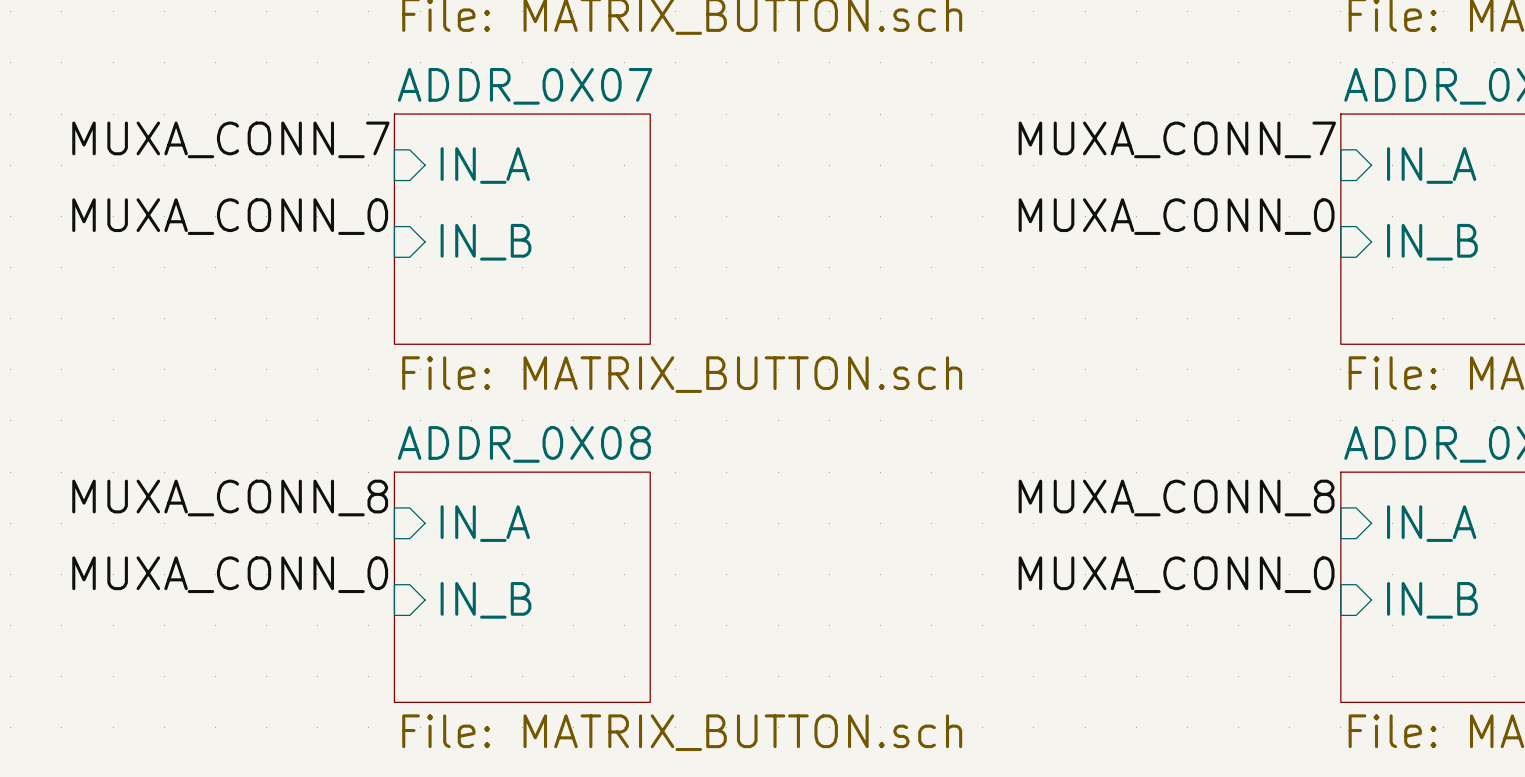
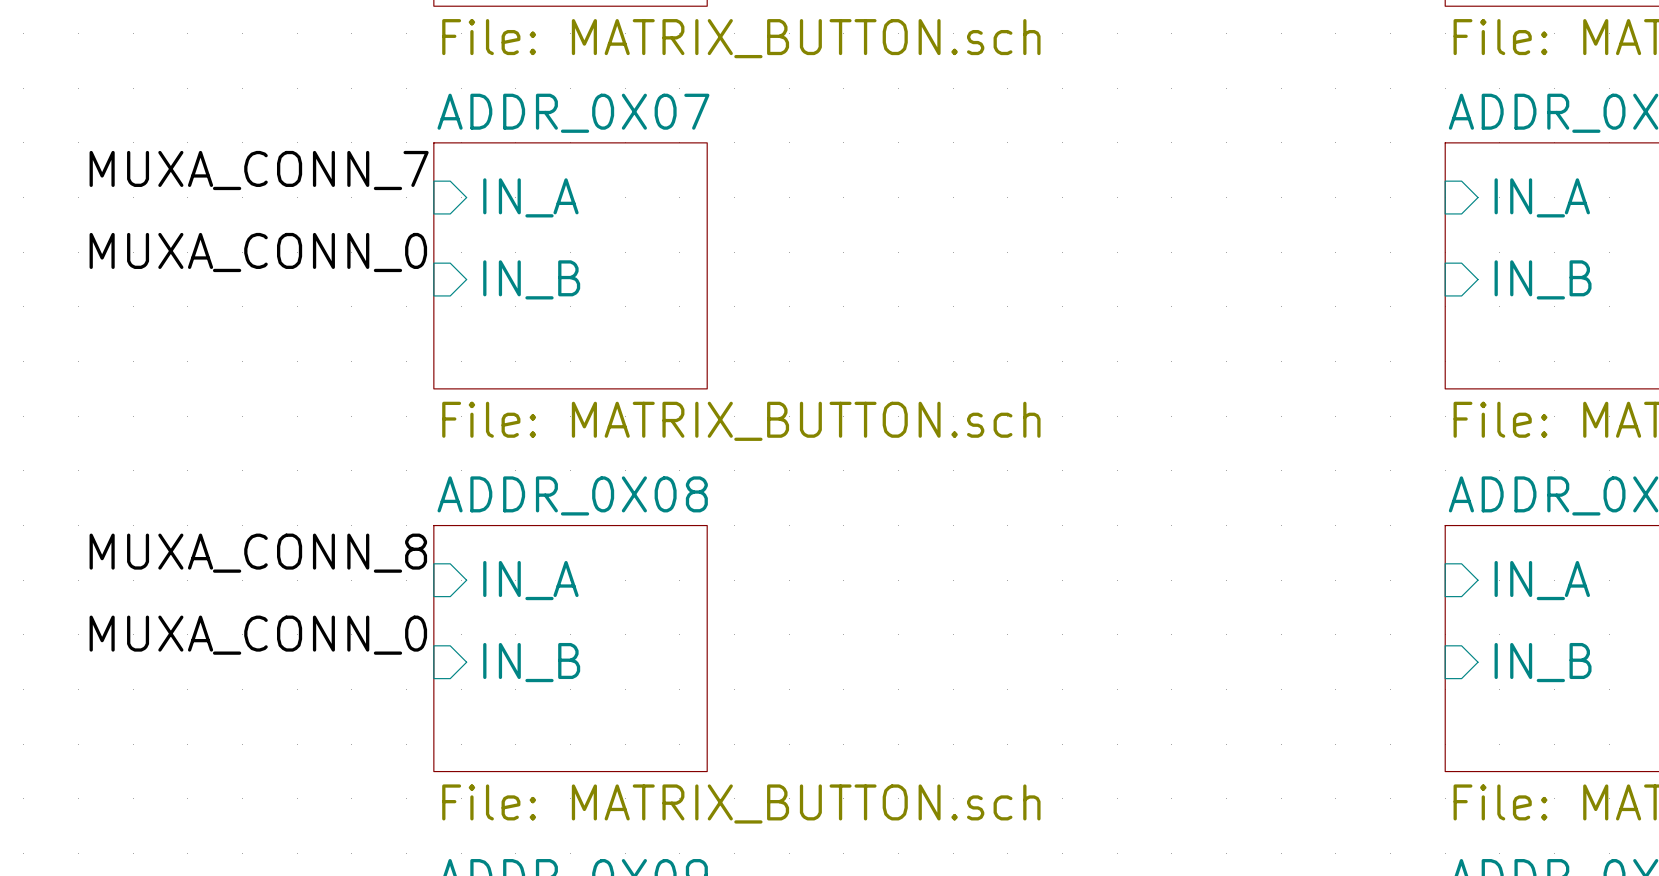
label: MUXA_CONN_7 (1177, 139) -> none
label: MUXA_CONN_0 (1176, 216) -> none
label: MUXA_CONN_8 (1176, 497) -> none
label: MUXA_CONN_0 (1176, 574) -> none

